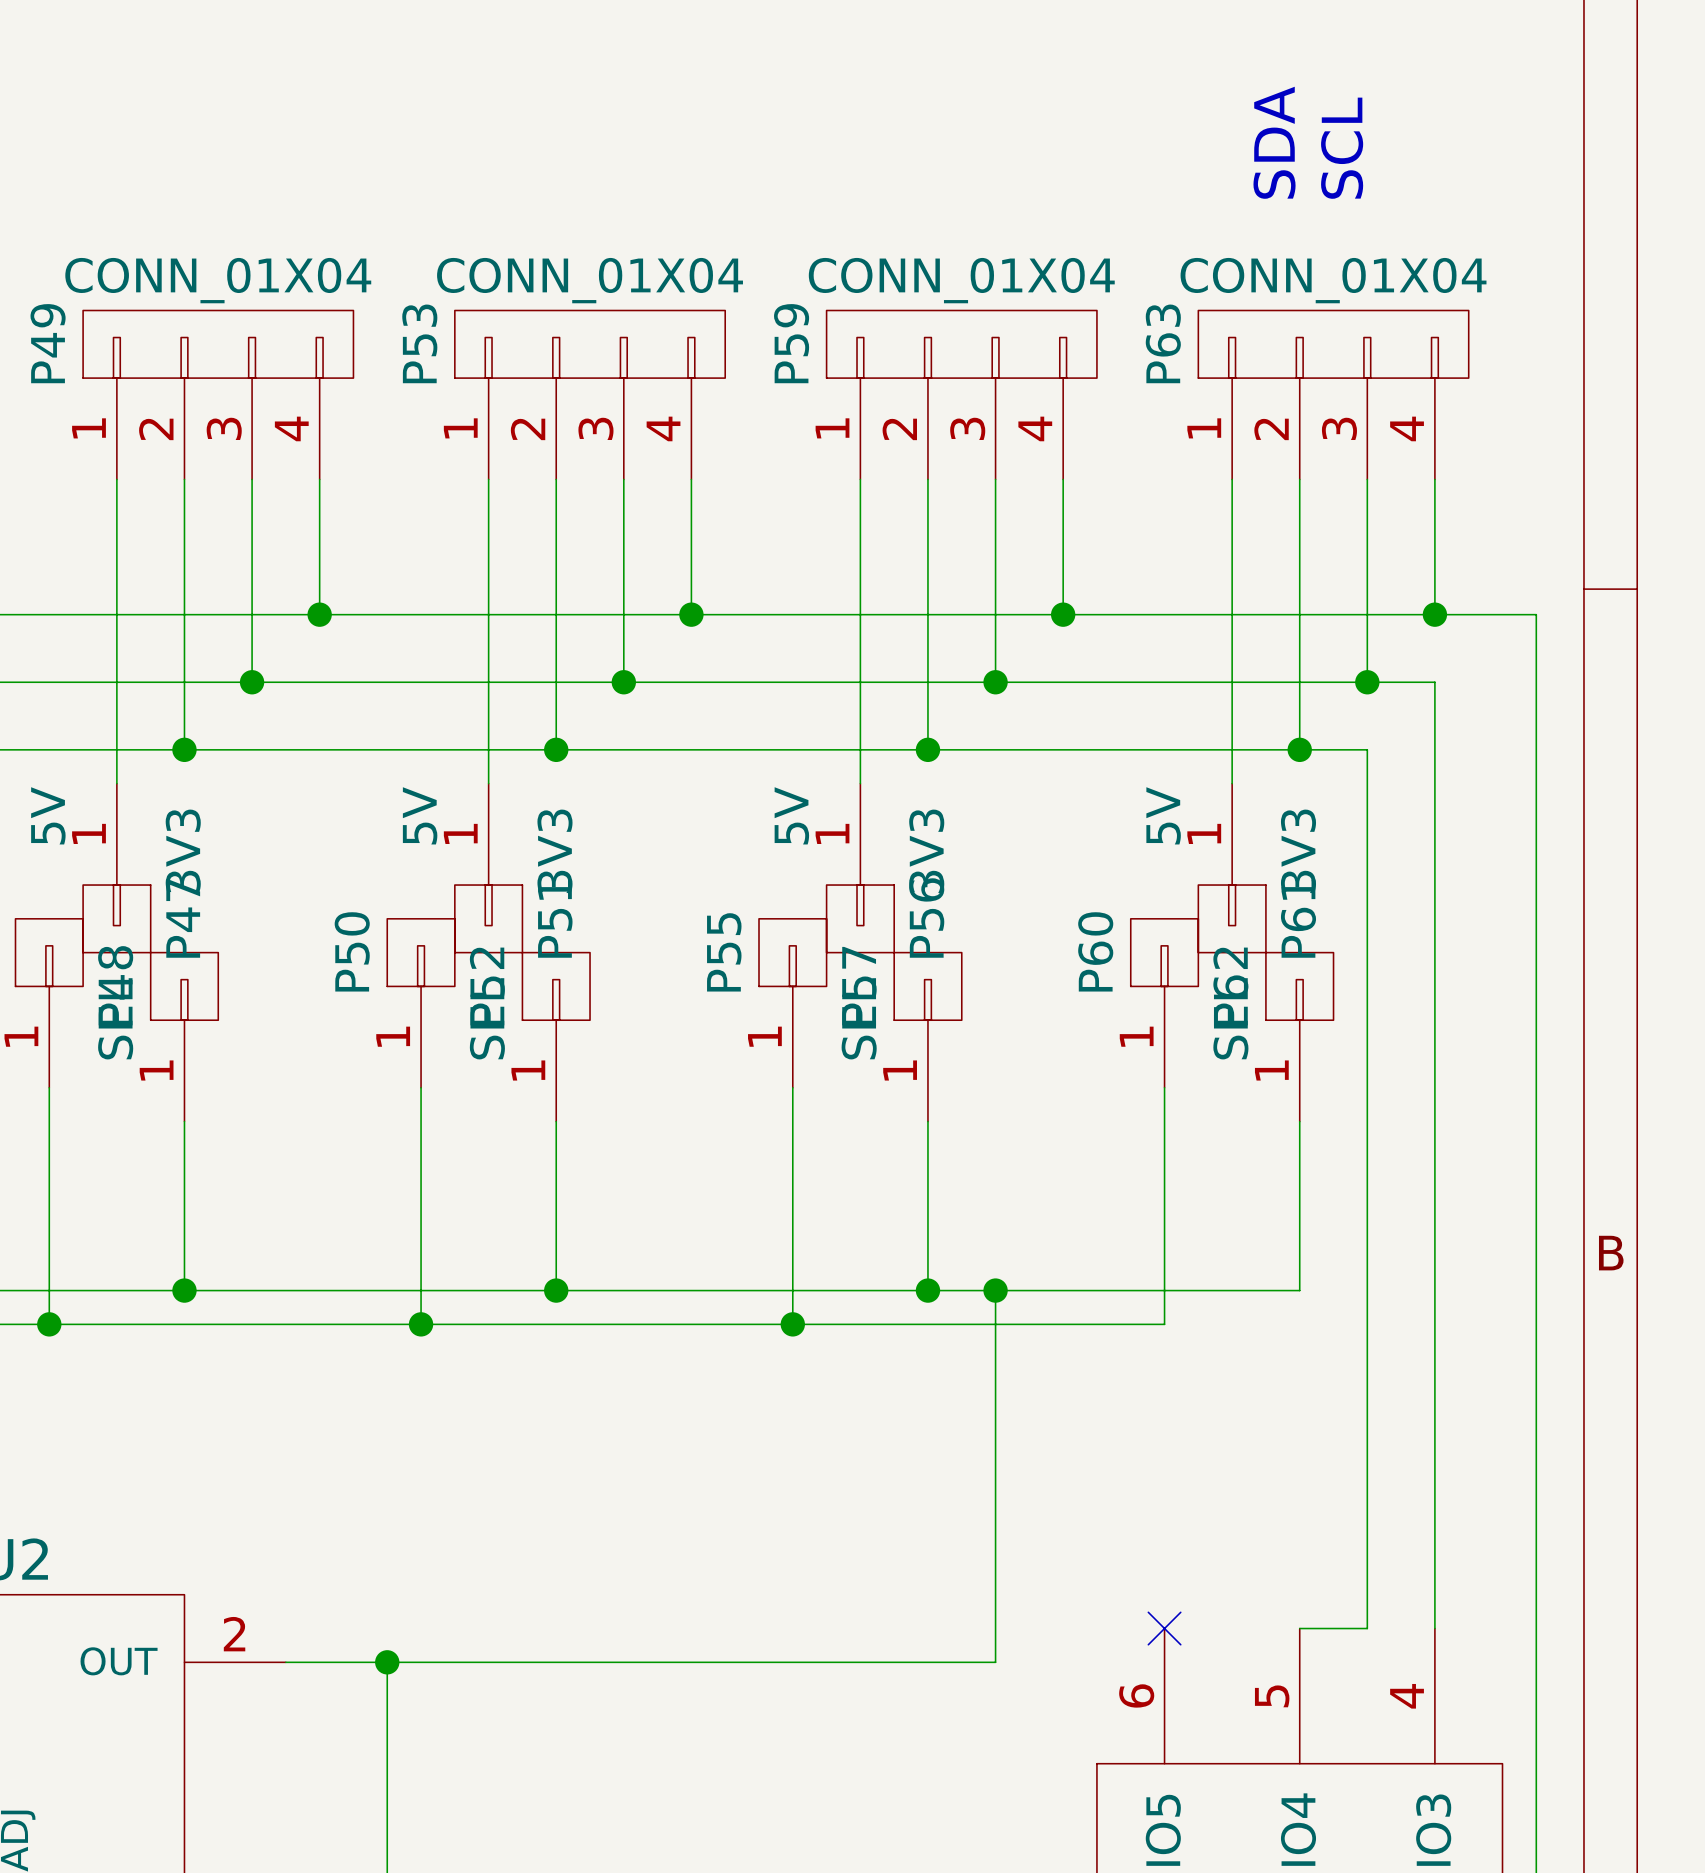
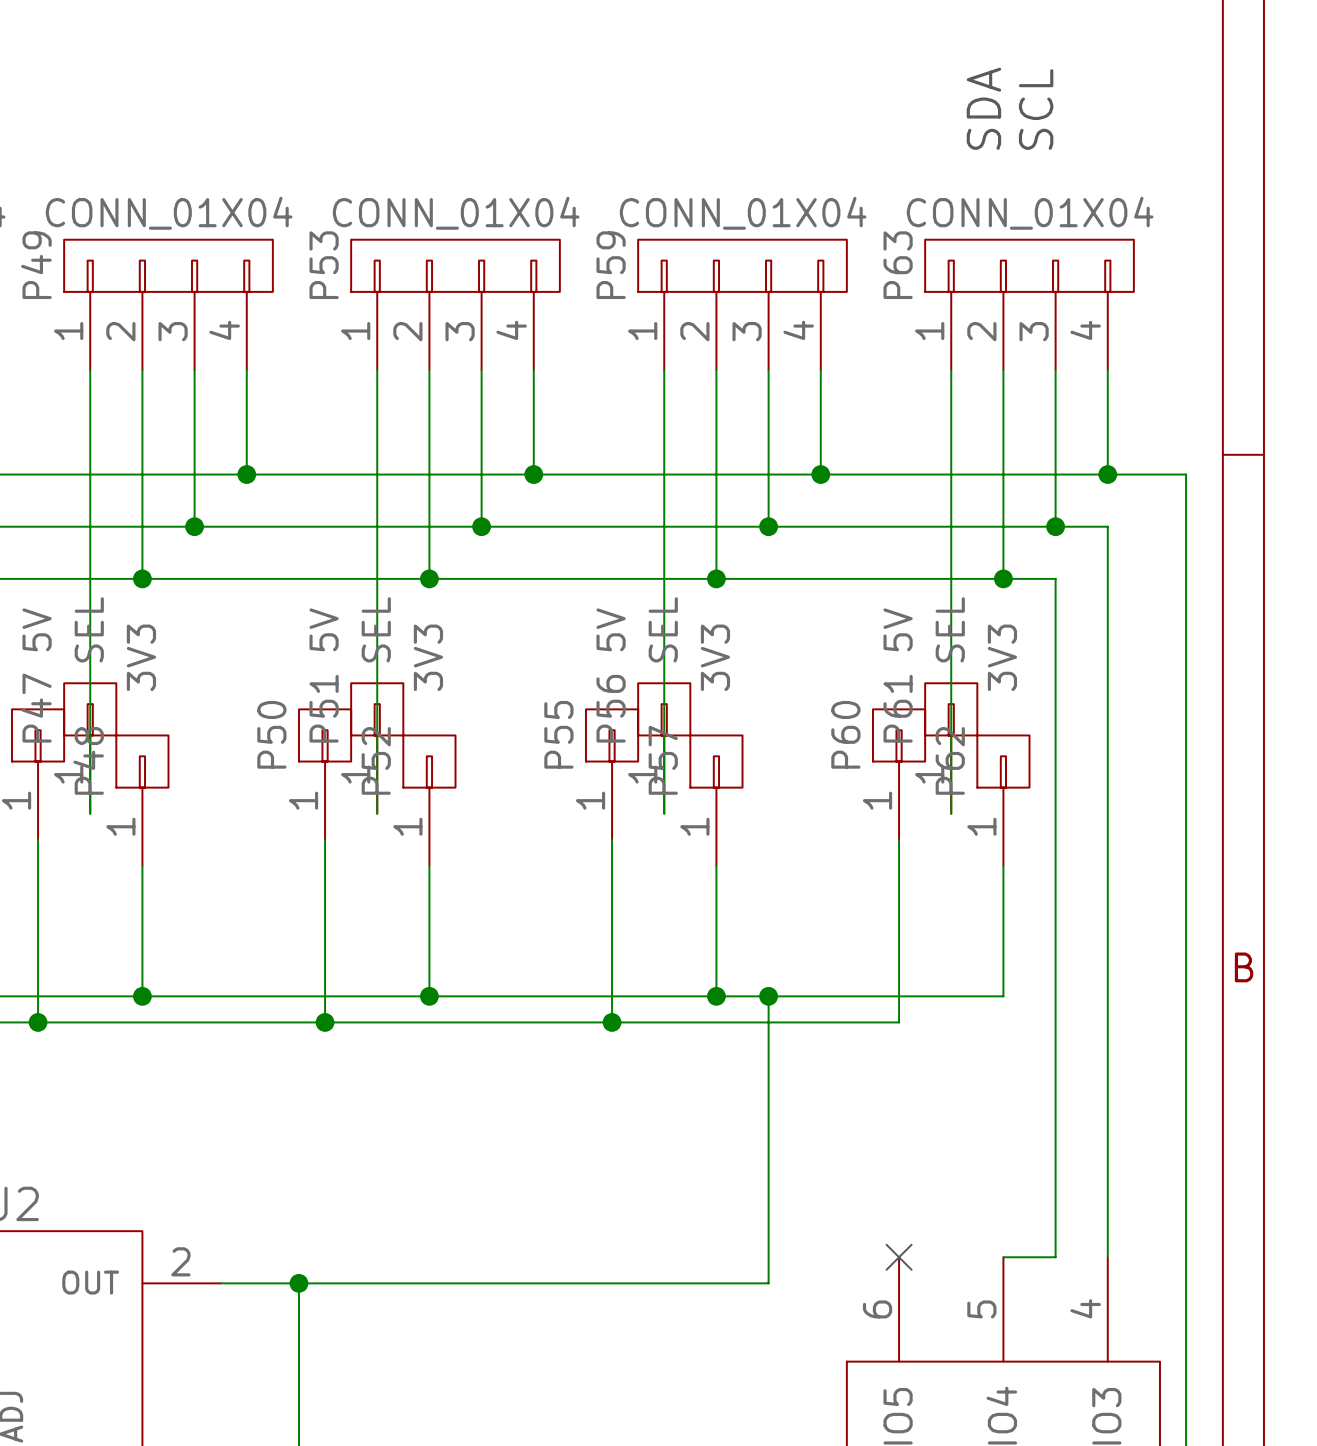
P47 position: (116, 868) -> (90, 748)
P51 position: (488, 868) -> (377, 748)
P56 position: (860, 868) -> (664, 748)
P61 position: (1232, 868) -> (951, 748)
P47 rotation: 0° (116, 918) -> 180° (90, 709)
P51 rotation: 0° (488, 918) -> 180° (377, 709)
P56 rotation: 0° (860, 918) -> 180° (664, 709)
P61 rotation: 0° (1232, 918) -> 180° (951, 709)

